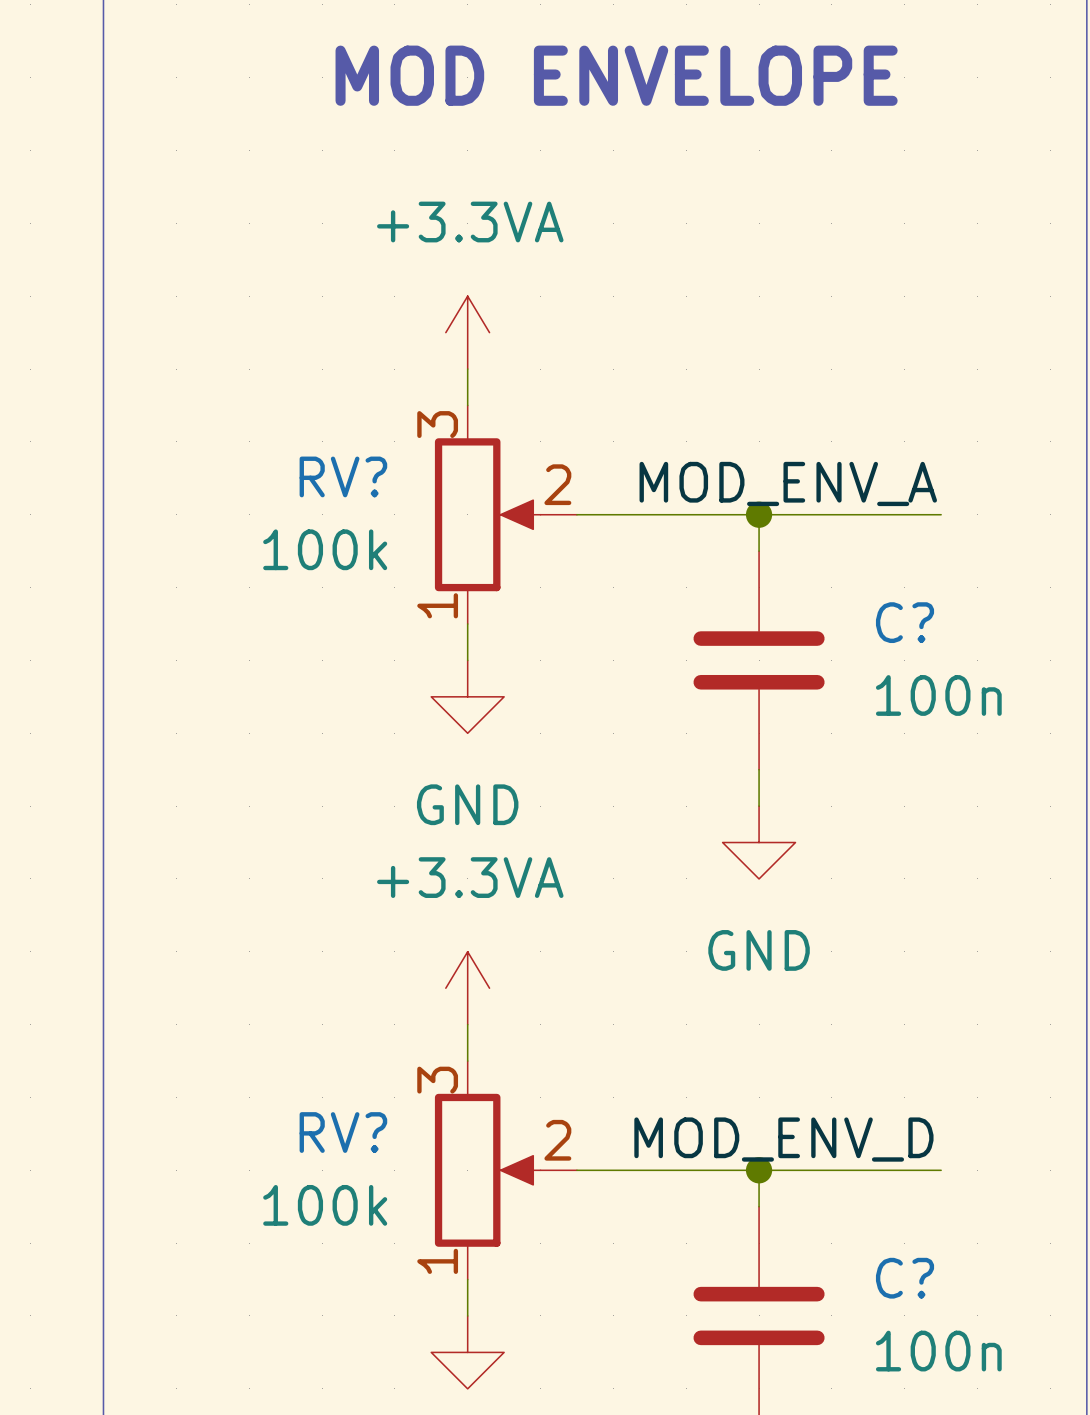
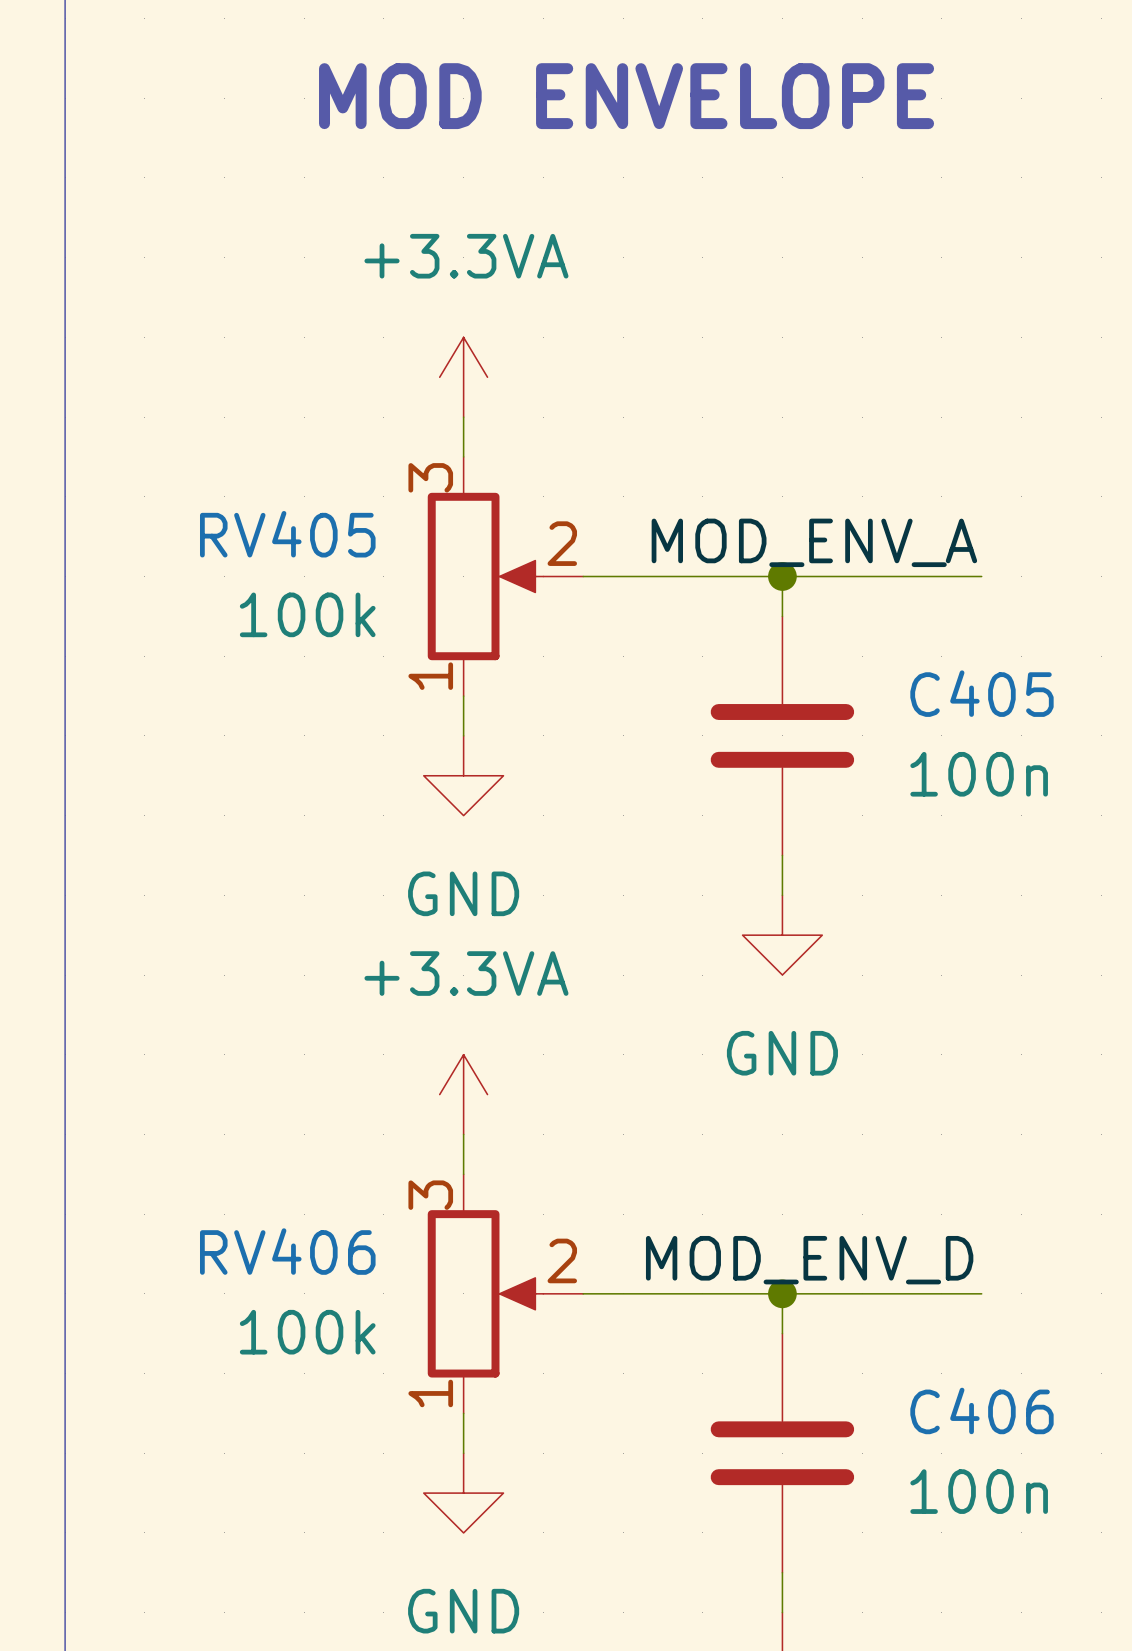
RV? name: RV? (343, 476) -> RV405 (287, 534)
C? name: C? (905, 622) -> C405 (981, 693)
RV? name: RV? (343, 1132) -> RV406 (287, 1251)
C? name: C? (905, 1278) -> C406 (981, 1410)

